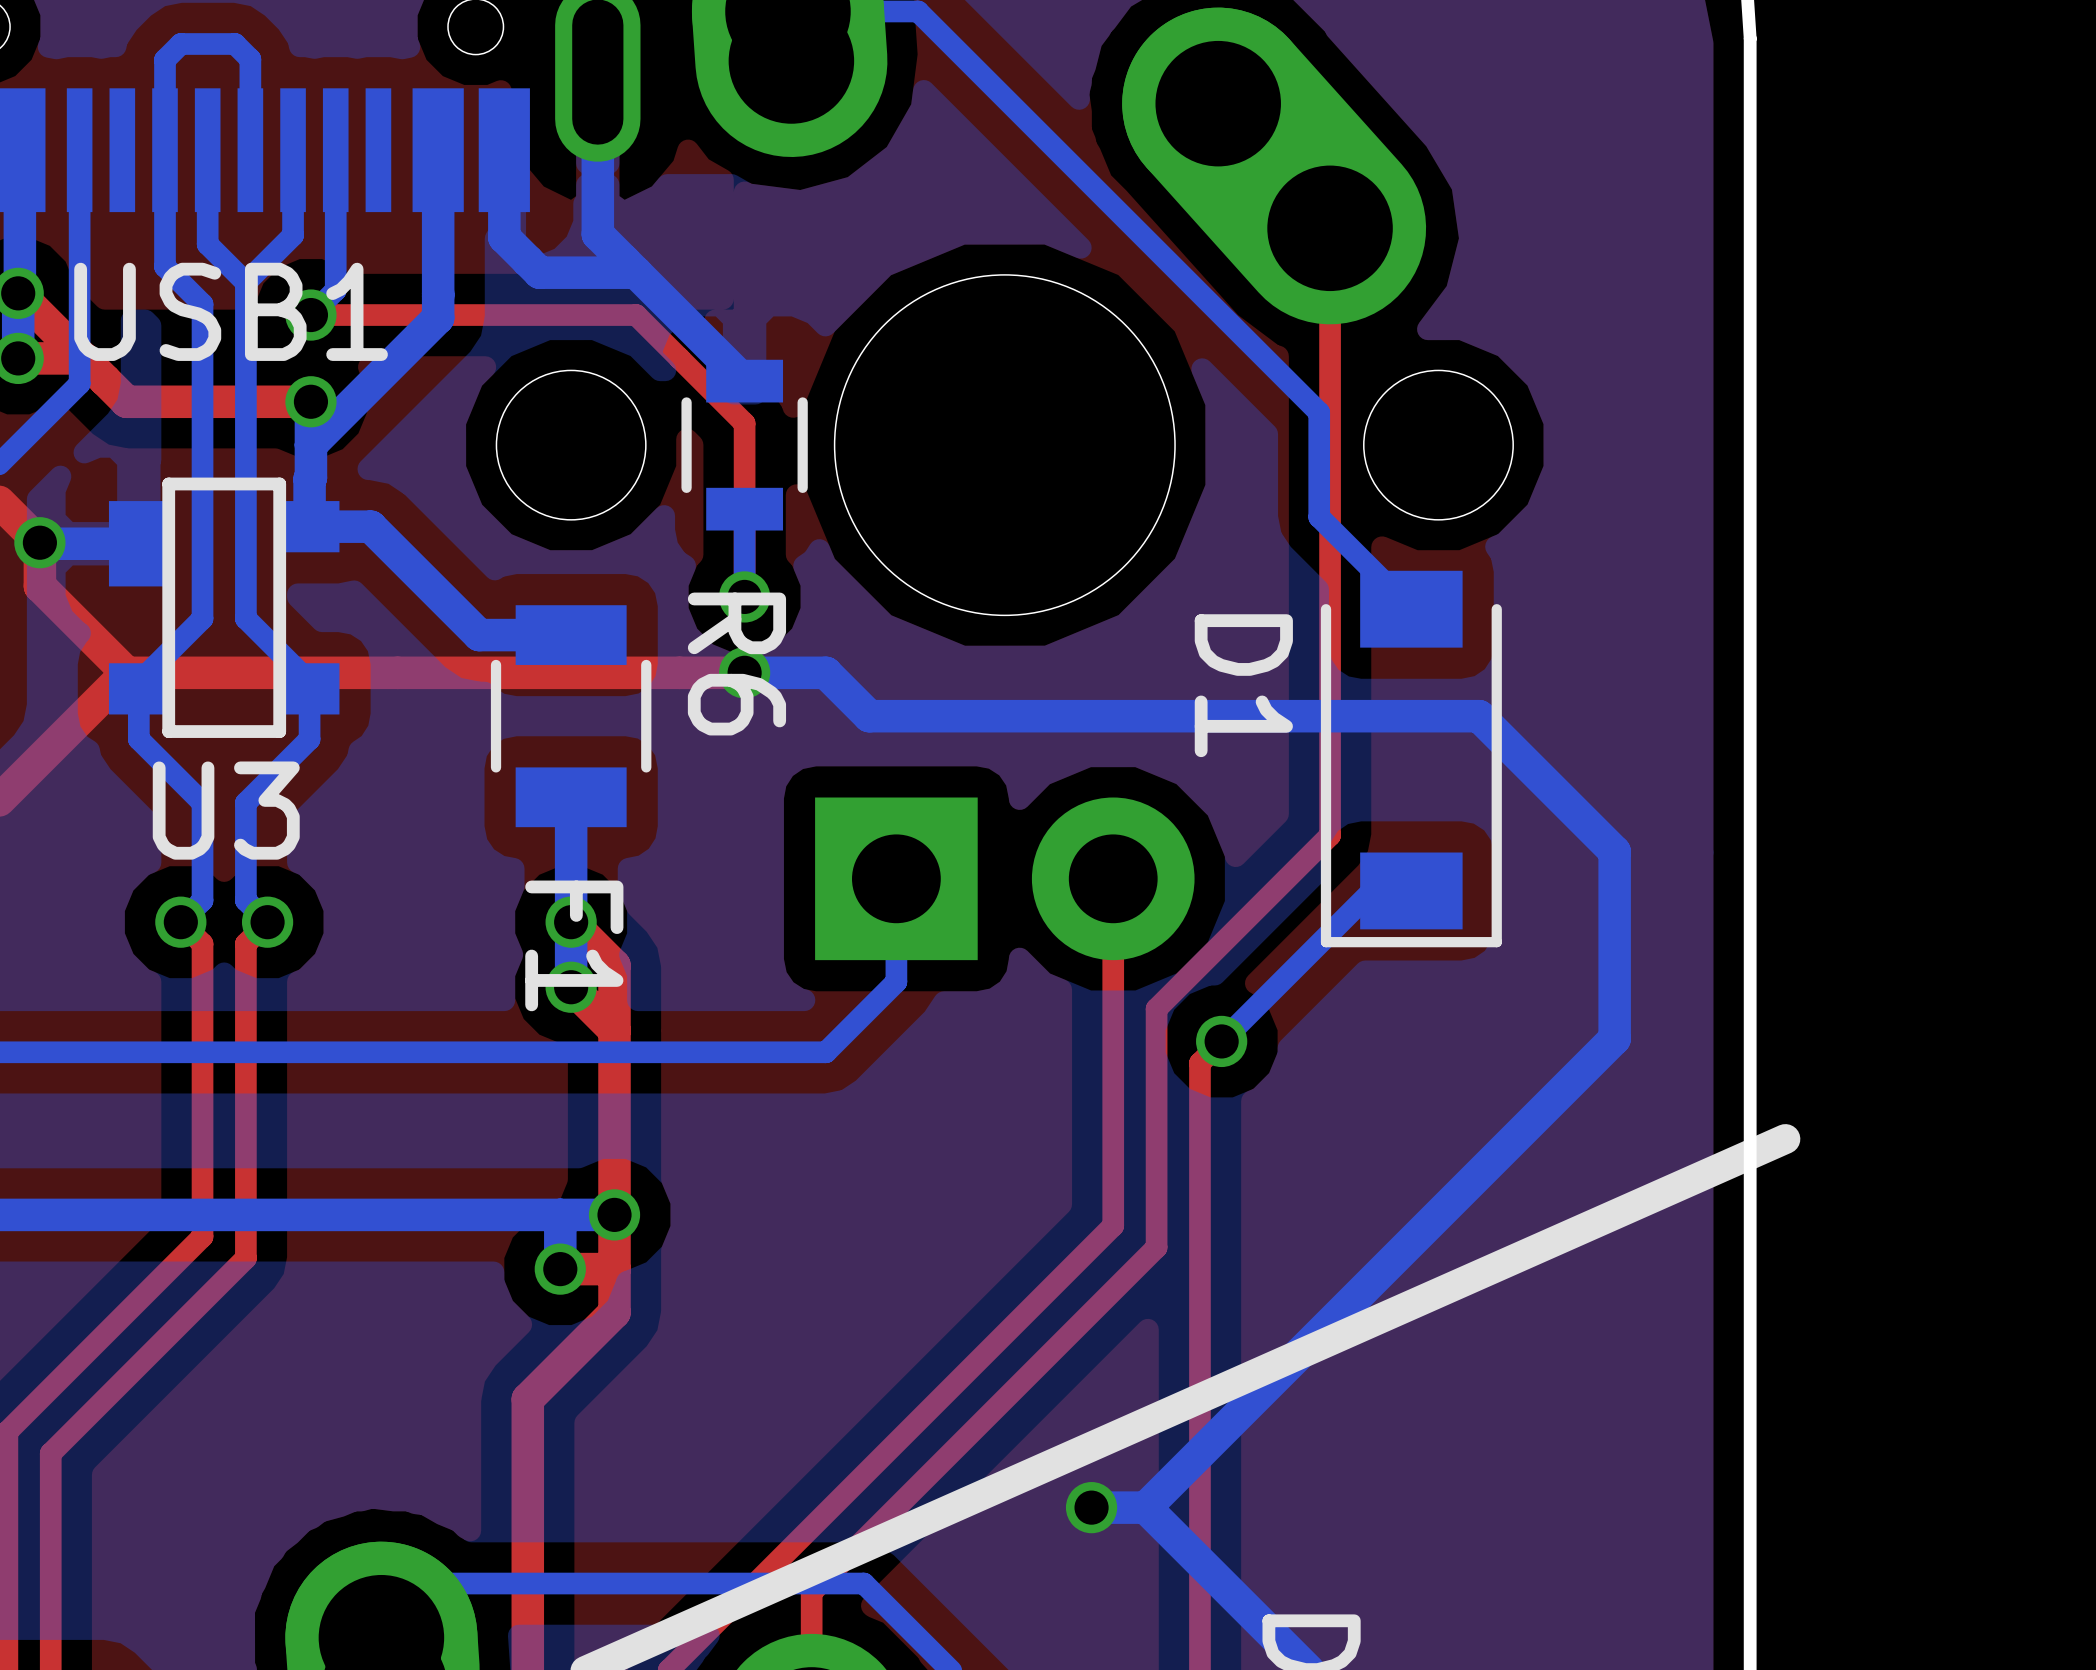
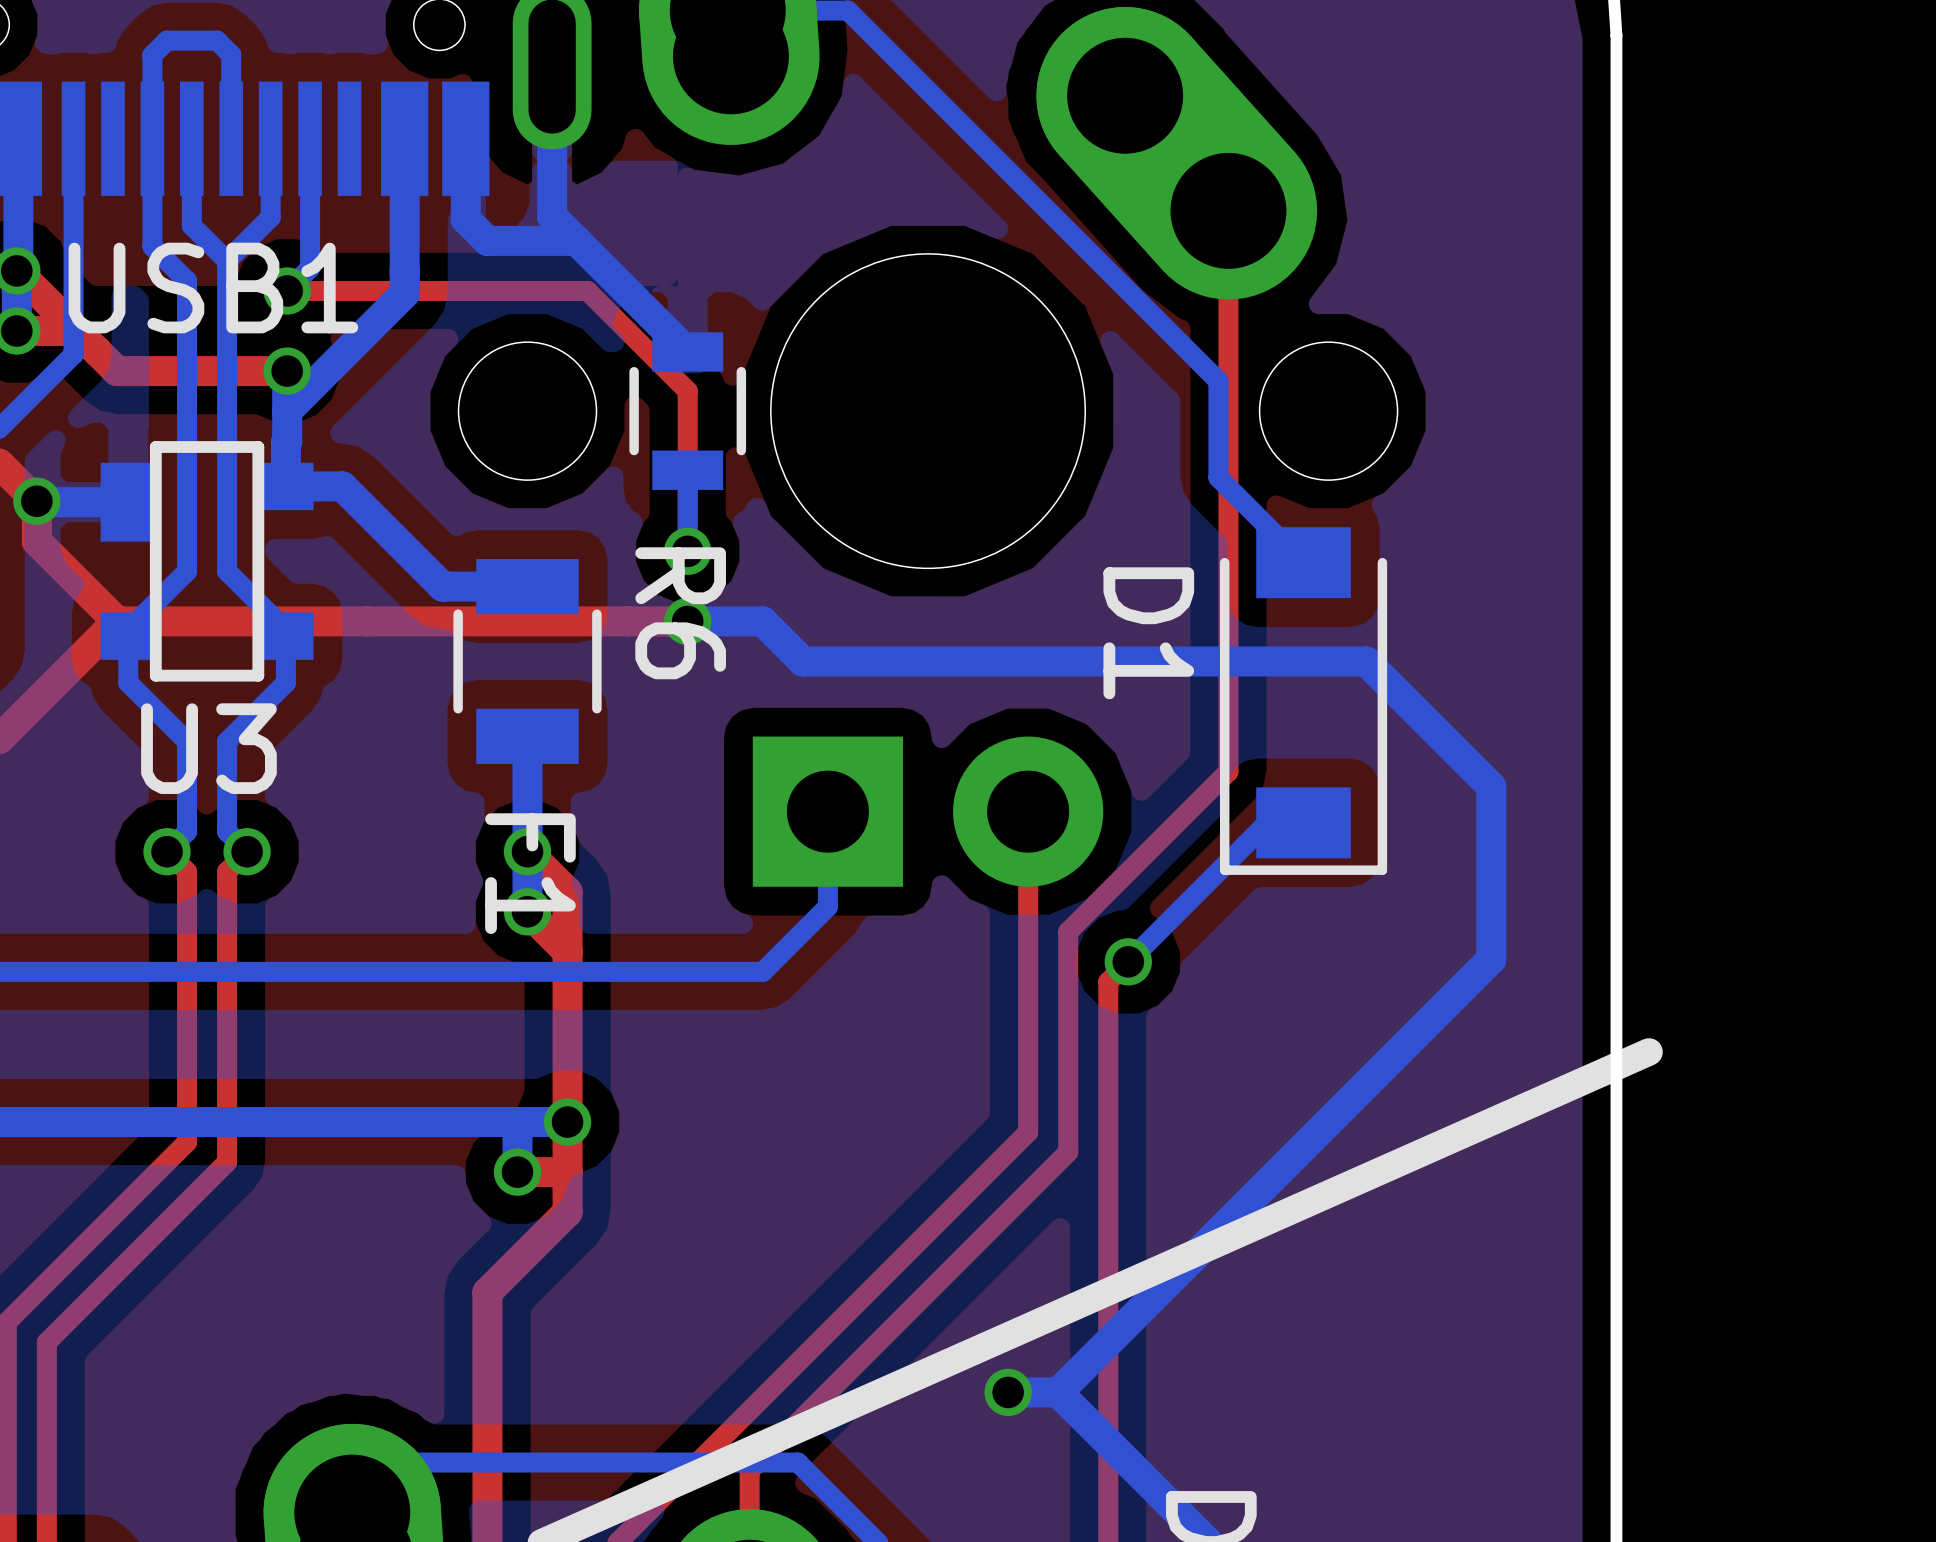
bottom track: (527, 260) (539, 272) (636, 272) -> (487, 240) (576, 240)

